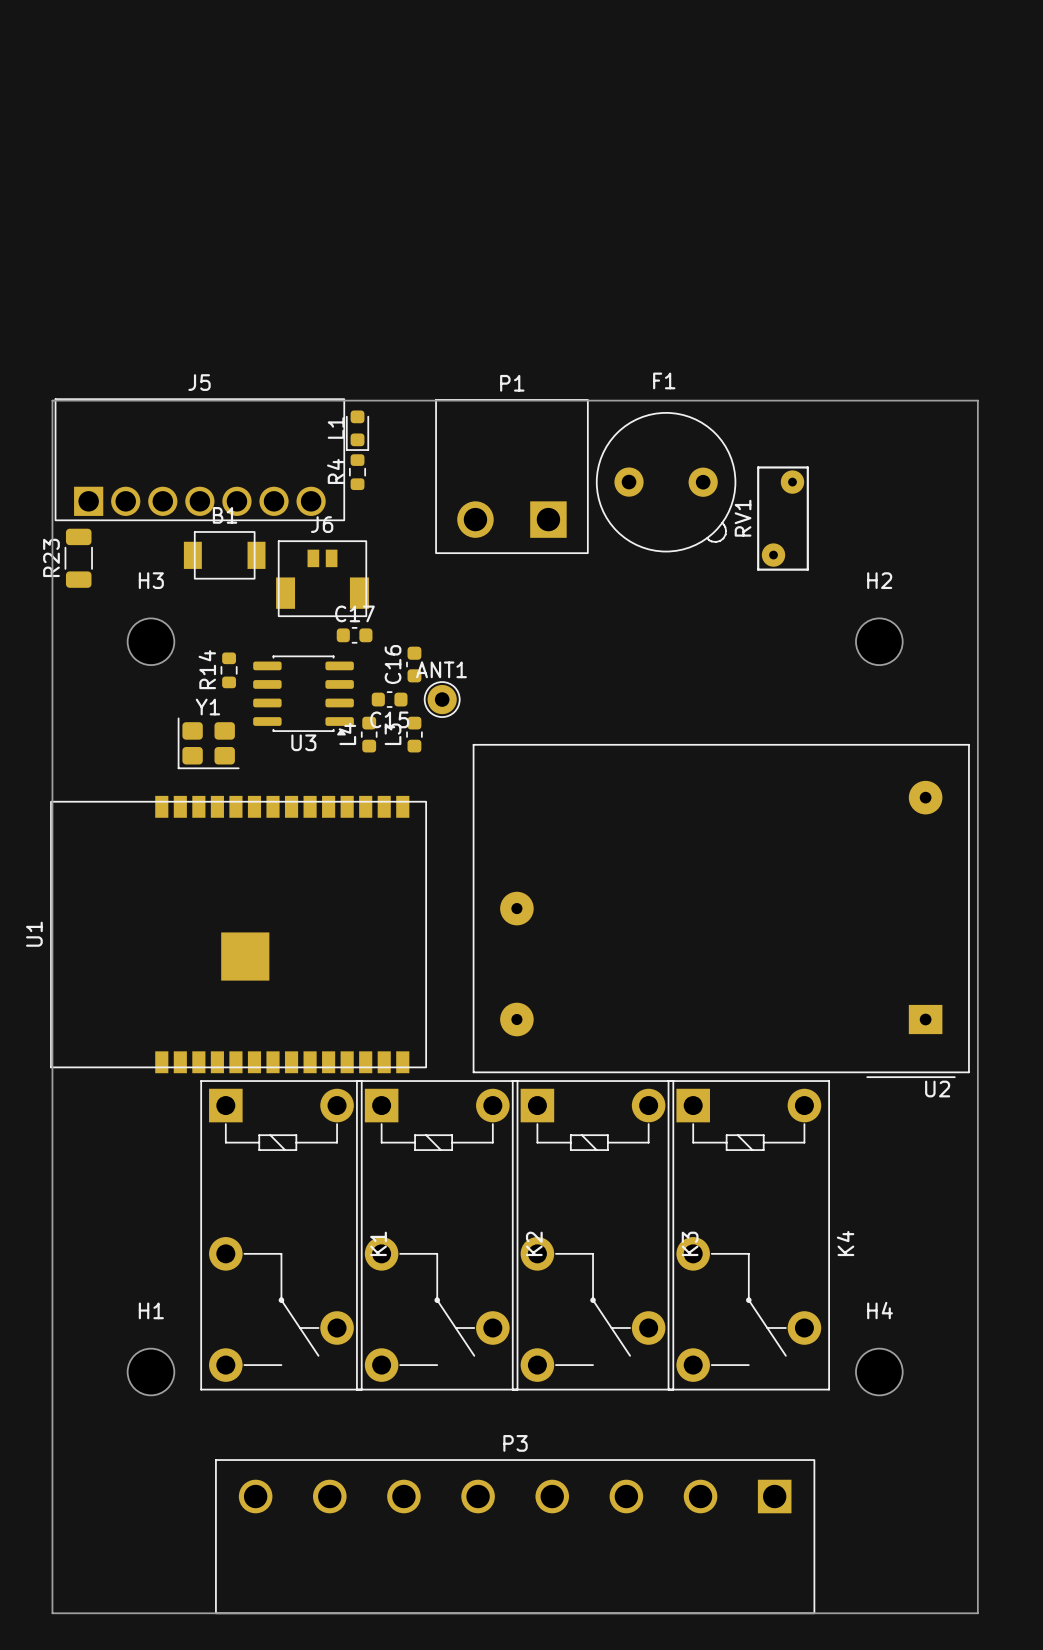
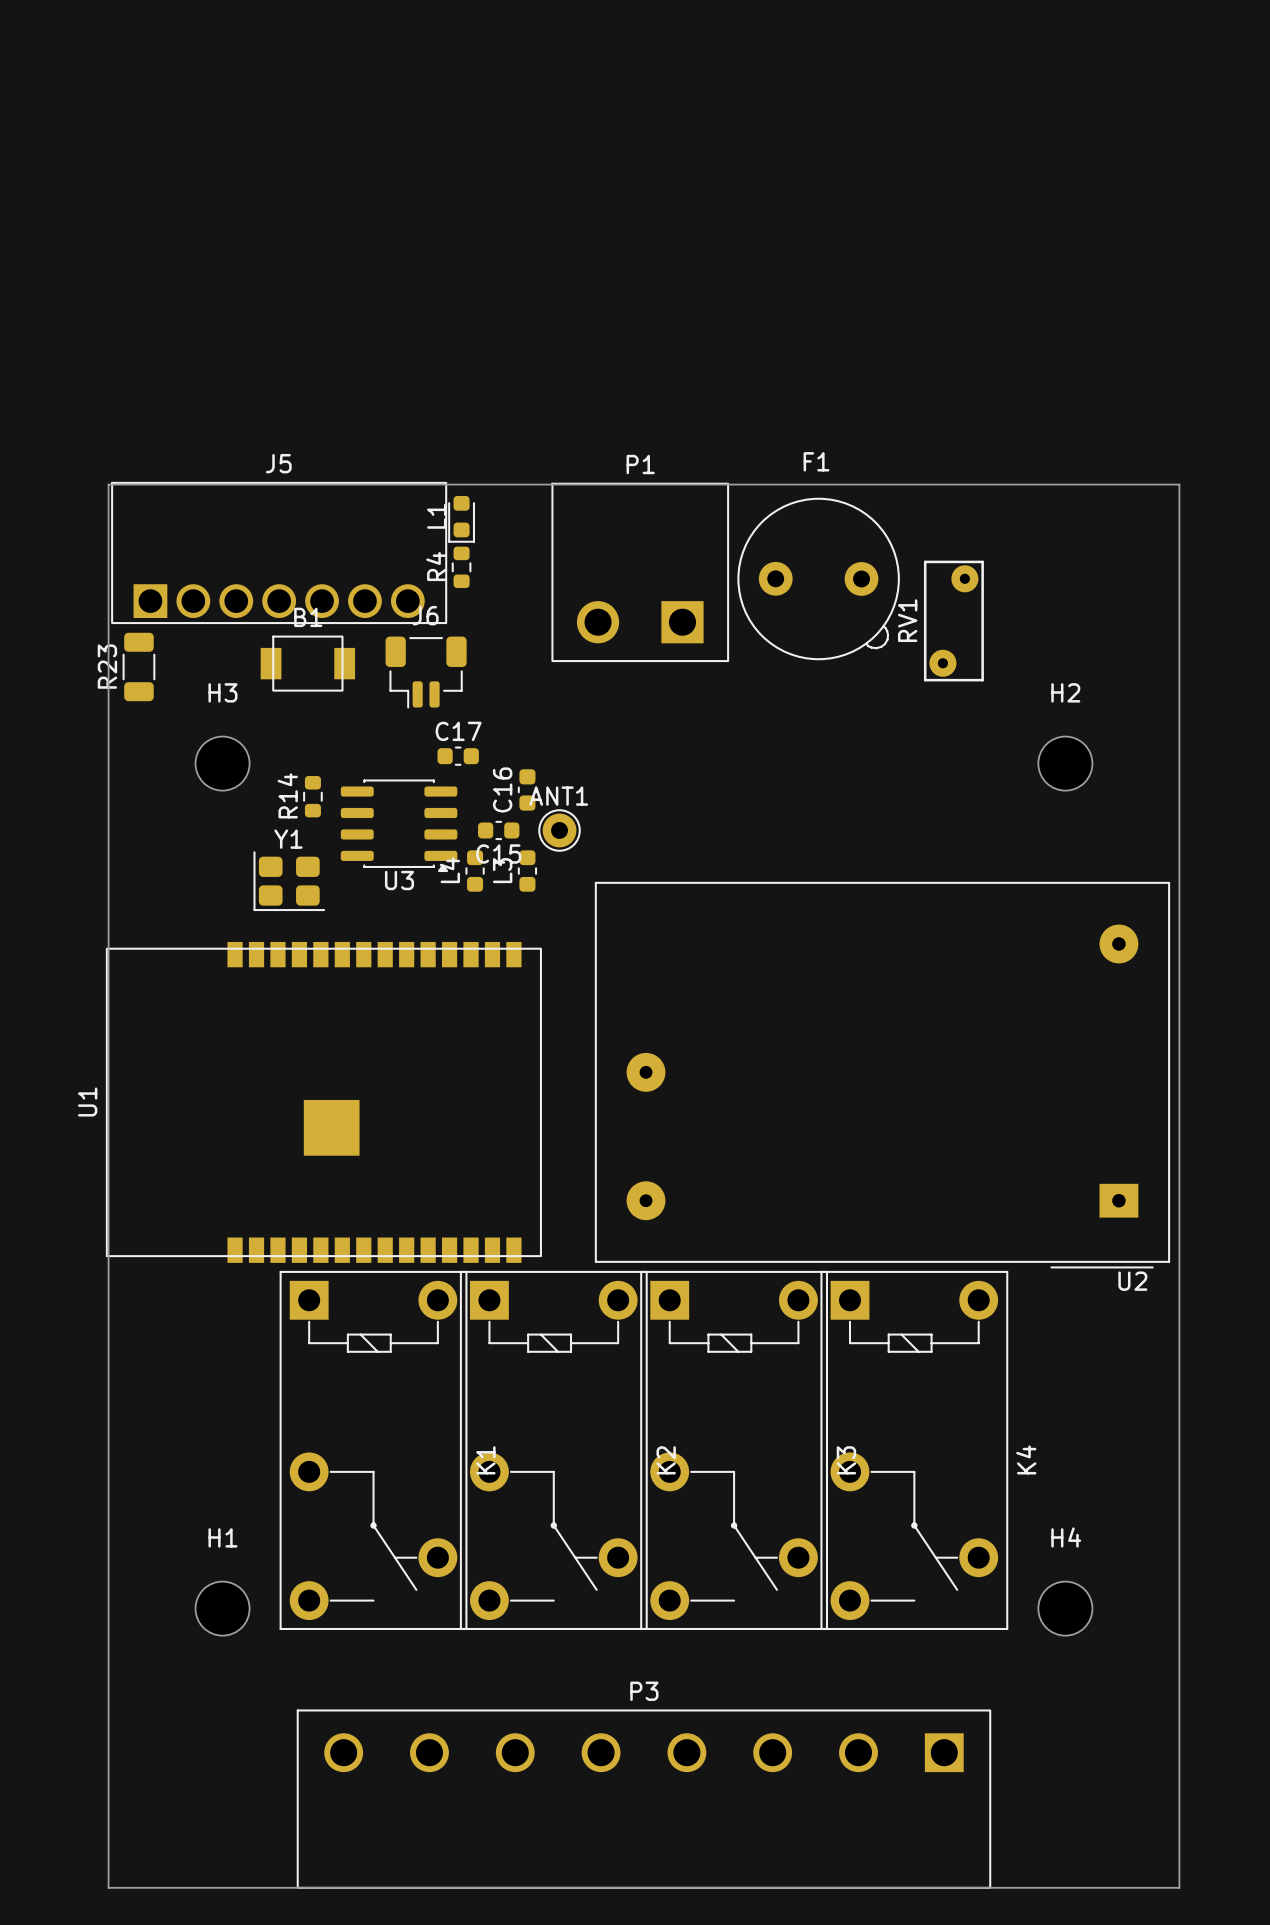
J6 footprint: [276, 540, 369, 618] -> [385, 636, 467, 709]

